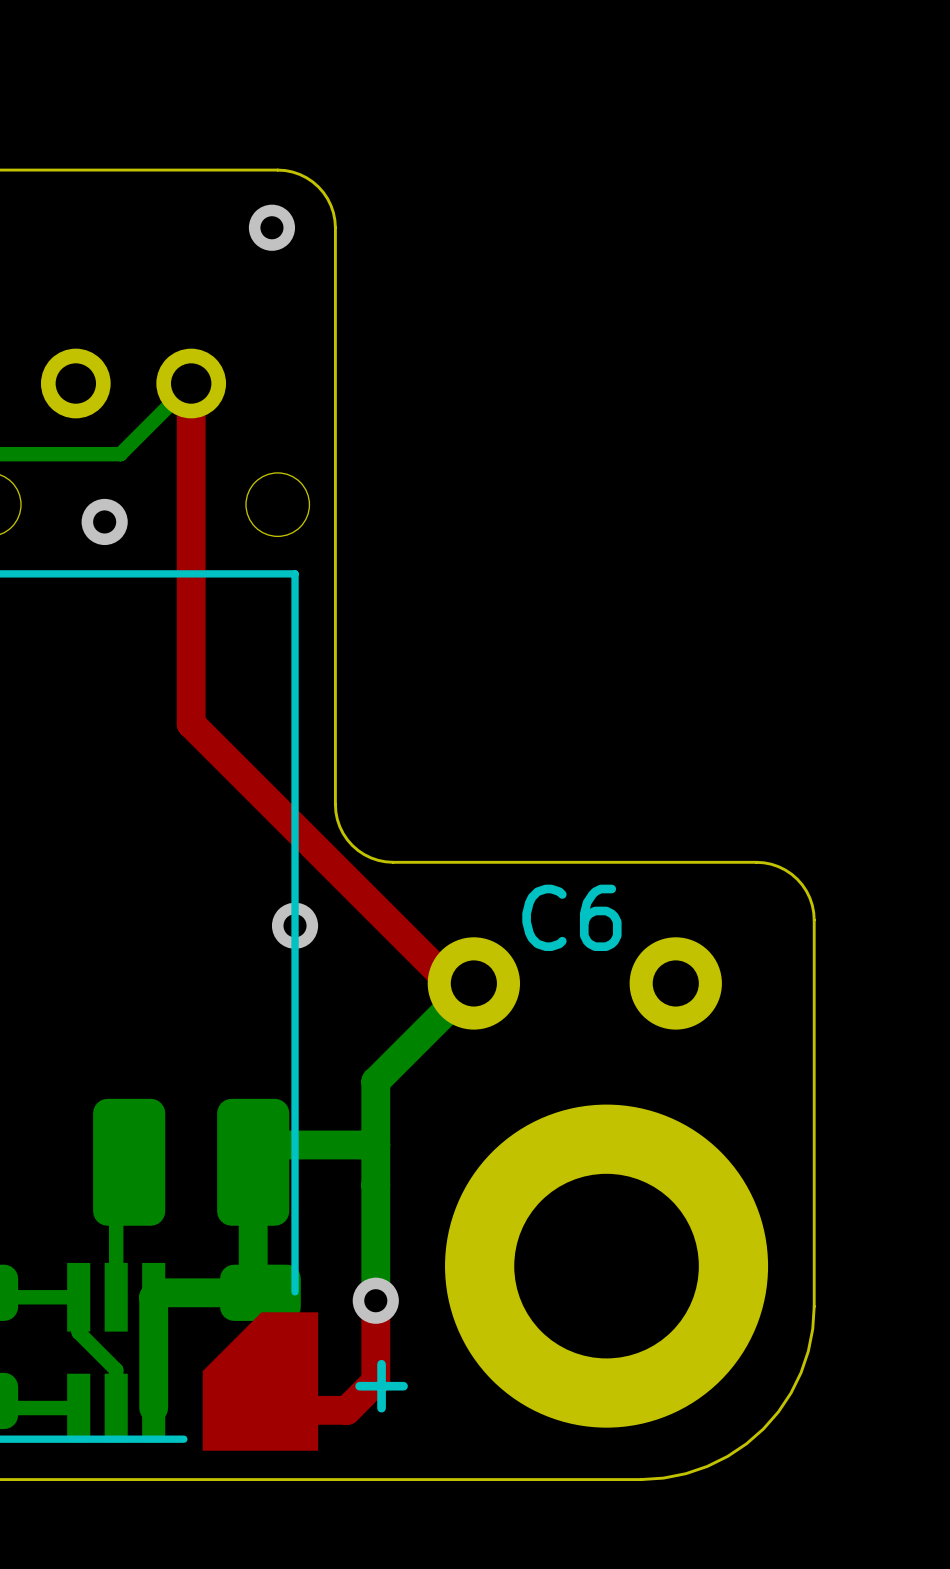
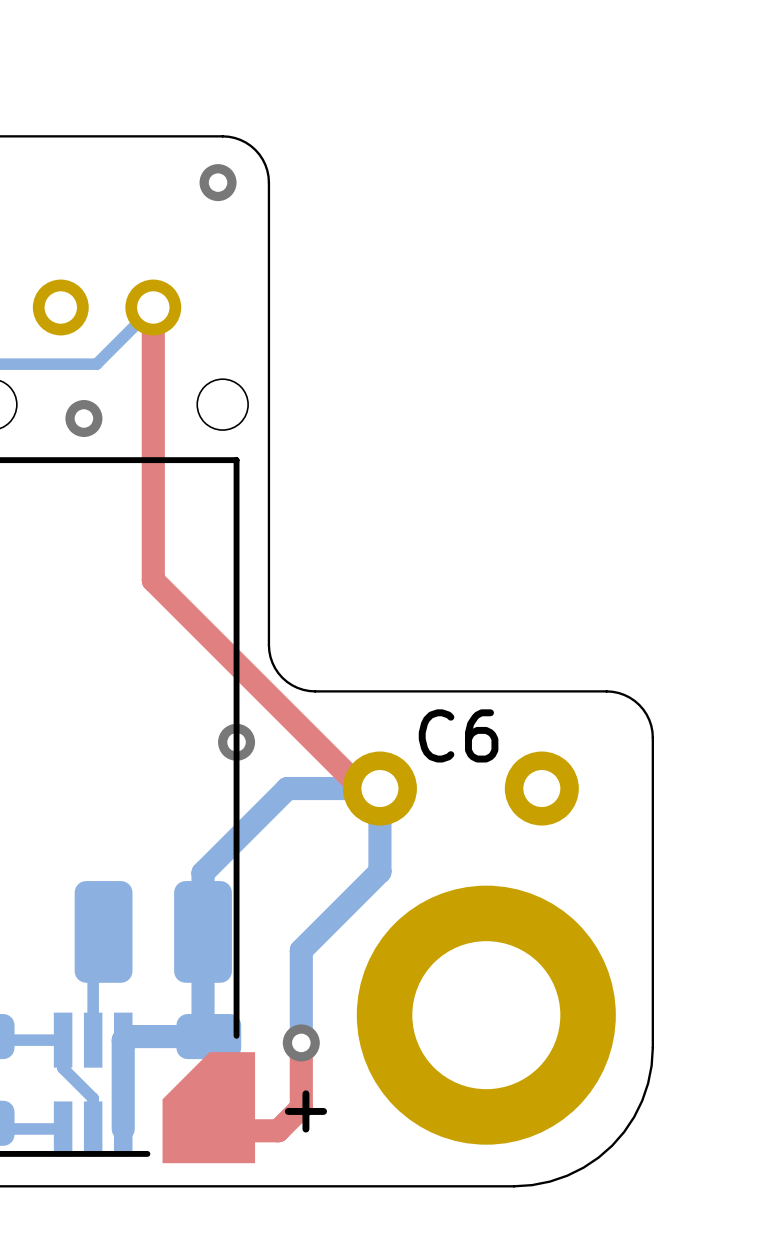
bottom track: (473, 983) (375, 1081) (375, 1185) -> none
bottom track: (375, 1144) (270, 1144) (253, 1162) -> (301, 950) (379, 871) (379, 788) (287, 788) (203, 872) (203, 931)

